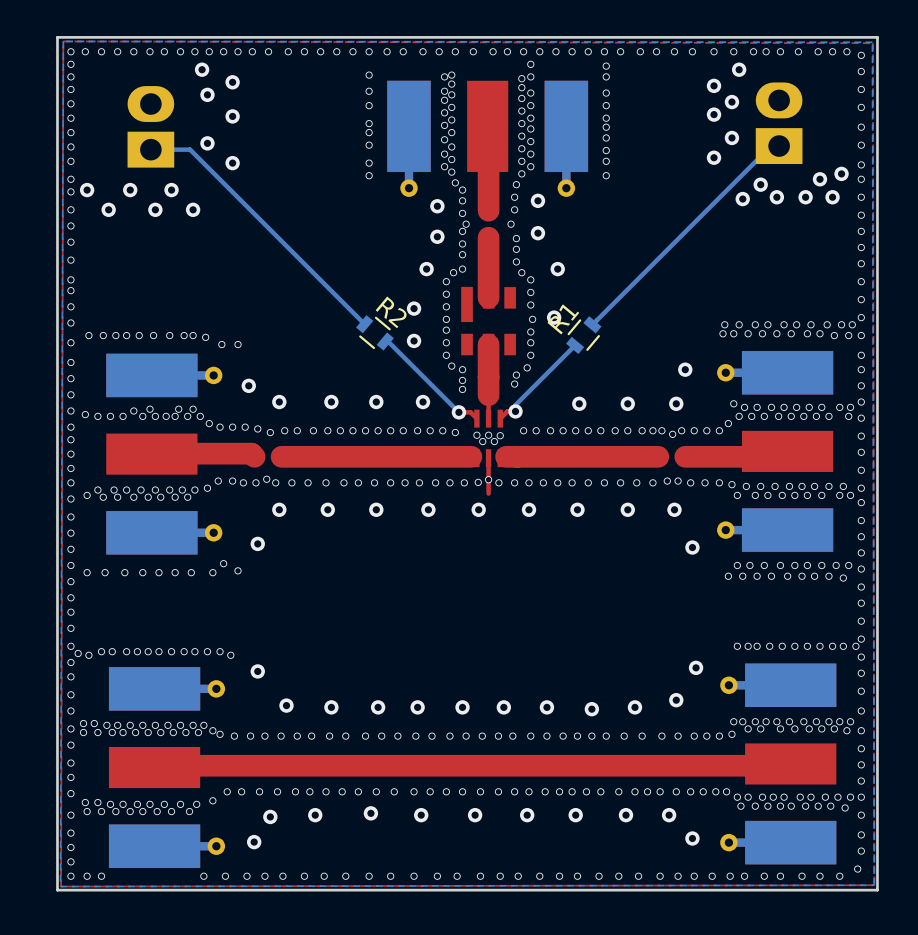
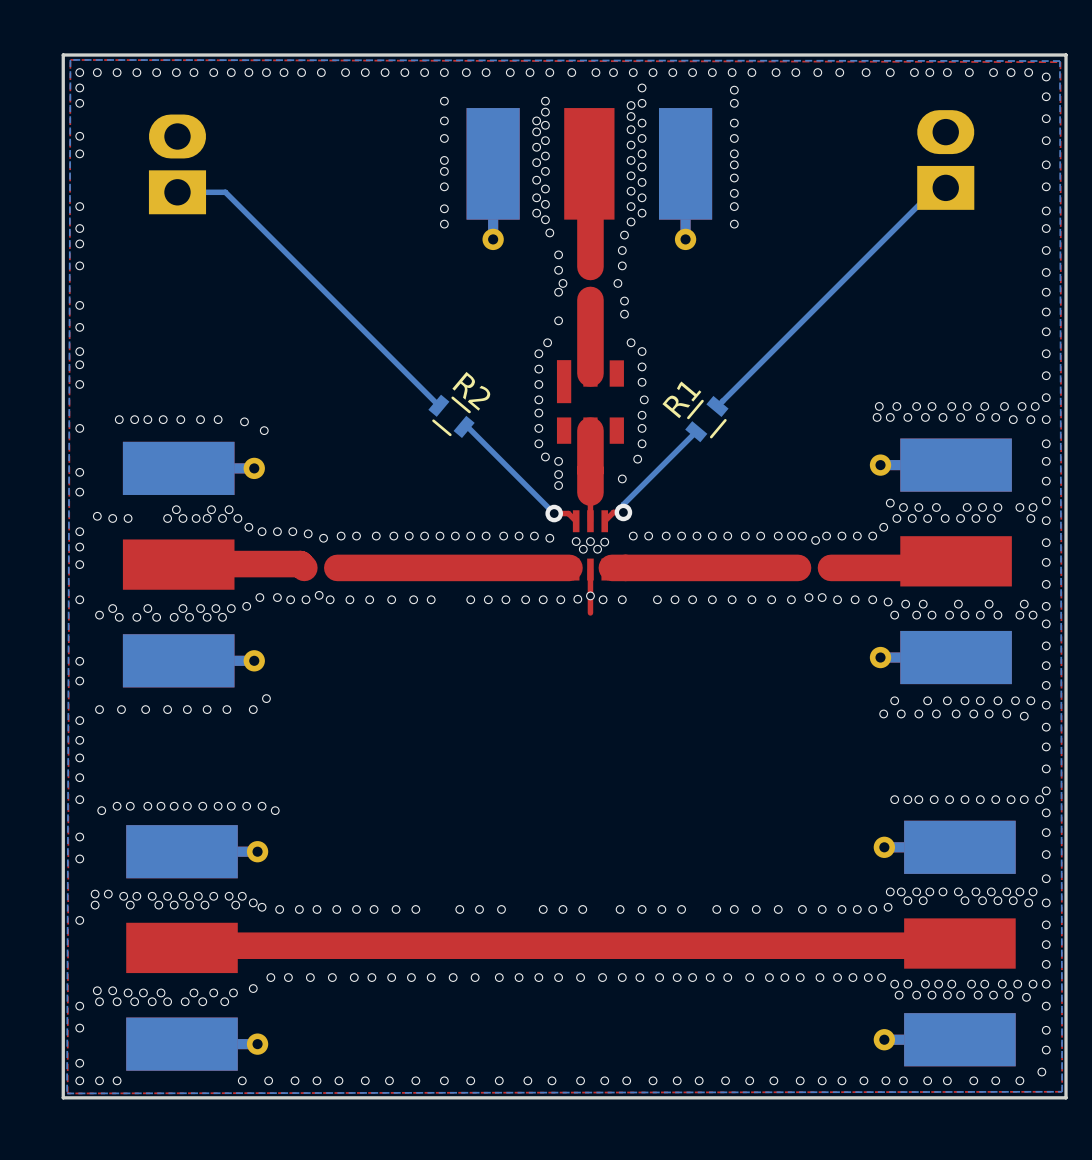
via: (202, 69) -> none
via: (739, 69) -> none
via: (444, 76) -> none
via: (232, 82) -> none
via: (714, 85) -> none
via: (70, 89) -> none
via: (207, 94) -> none
via: (731, 102) -> none
via: (714, 114) -> none
via: (232, 116) -> none
via: (70, 132) -> none
via: (731, 137) -> none
via: (207, 143) -> none
via: (70, 146) -> none
via: (714, 157) -> none
via: (232, 163) -> none
via: (841, 173) -> none
via: (819, 179) -> none
via: (760, 184) -> none
via: (87, 190) -> none
via: (130, 190) -> none
via: (171, 190) -> none
via: (462, 190) -> none
via: (776, 197) -> none
via: (805, 197) -> none
via: (832, 197) -> none
via: (742, 199) -> none
via: (537, 200) -> none
via: (437, 206) -> none
via: (108, 209) -> none
via: (155, 209) -> none
via: (193, 209) -> none
via: (70, 225) -> none
via: (537, 233) -> none
via: (437, 236) -> none
via: (462, 243) -> none
via: (516, 261) -> none
via: (426, 269) -> none
via: (462, 269) -> none
via: (557, 269) -> none
via: (414, 308) -> none
via: (554, 317) -> none
via: (70, 322) -> none
via: (88, 335) -> none
via: (193, 335) -> none
via: (414, 340) -> none
via: (238, 344) -> none
via: (70, 362) -> none
via: (685, 369) -> none
via: (516, 375) -> none
via: (248, 385) -> none
via: (279, 402) -> none
via: (331, 402) -> none
via: (376, 402) -> none
via: (423, 402) -> none
via: (579, 403) -> none
via: (627, 403) -> none
via: (676, 403) -> none
via: (784, 407) -> none
via: (70, 411) -> none
via: (133, 411) -> none
via: (123, 416) -> none
via: (828, 416) -> none
via: (70, 468) -> none
via: (374, 482) -> none
via: (528, 482) -> none
via: (775, 486) -> none
via: (802, 486) -> none
via: (828, 486) -> none
via: (114, 490) -> none
via: (141, 490) -> none
via: (70, 499) -> none
via: (279, 509) -> none
via: (327, 509) -> none
via: (376, 509) -> none
via: (428, 509) -> none
via: (478, 509) -> none
via: (528, 509) -> none
via: (577, 509) -> none
via: (627, 509) -> none
via: (674, 509) -> none
via: (70, 516) -> none
via: (257, 543) -> none
via: (692, 547) -> none
via: (70, 565) -> none
via: (749, 565) -> none
via: (238, 570) -> none
via: (78, 653) -> none
via: (70, 662) -> none
via: (696, 667) -> none
via: (257, 671) -> none
via: (676, 700) -> none
via: (286, 705) -> none
via: (331, 707) -> none
via: (378, 707) -> none
via: (417, 707) -> none
via: (462, 707) -> none
via: (503, 707) -> none
via: (546, 707) -> none
via: (634, 707) -> none
via: (591, 709) -> none
via: (70, 710) -> none
via: (70, 728) -> none
via: (780, 728) -> none
via: (97, 732) -> none
via: (123, 732) -> none
via: (185, 732) -> none
via: (365, 736) -> none
via: (431, 736) -> none
via: (498, 736) -> none
via: (577, 736) -> none
via: (70, 763) -> none
via: (70, 777) -> none
via: (70, 793) -> none
via: (149, 804) -> none
via: (370, 813) -> none
via: (315, 815) -> none
via: (421, 815) -> none
via: (475, 815) -> none
via: (527, 815) -> none
via: (575, 815) -> none
via: (625, 815) -> none
via: (669, 815) -> none
via: (270, 816) -> none
via: (692, 838) -> none
via: (254, 842) -> none
via: (70, 847) -> none

